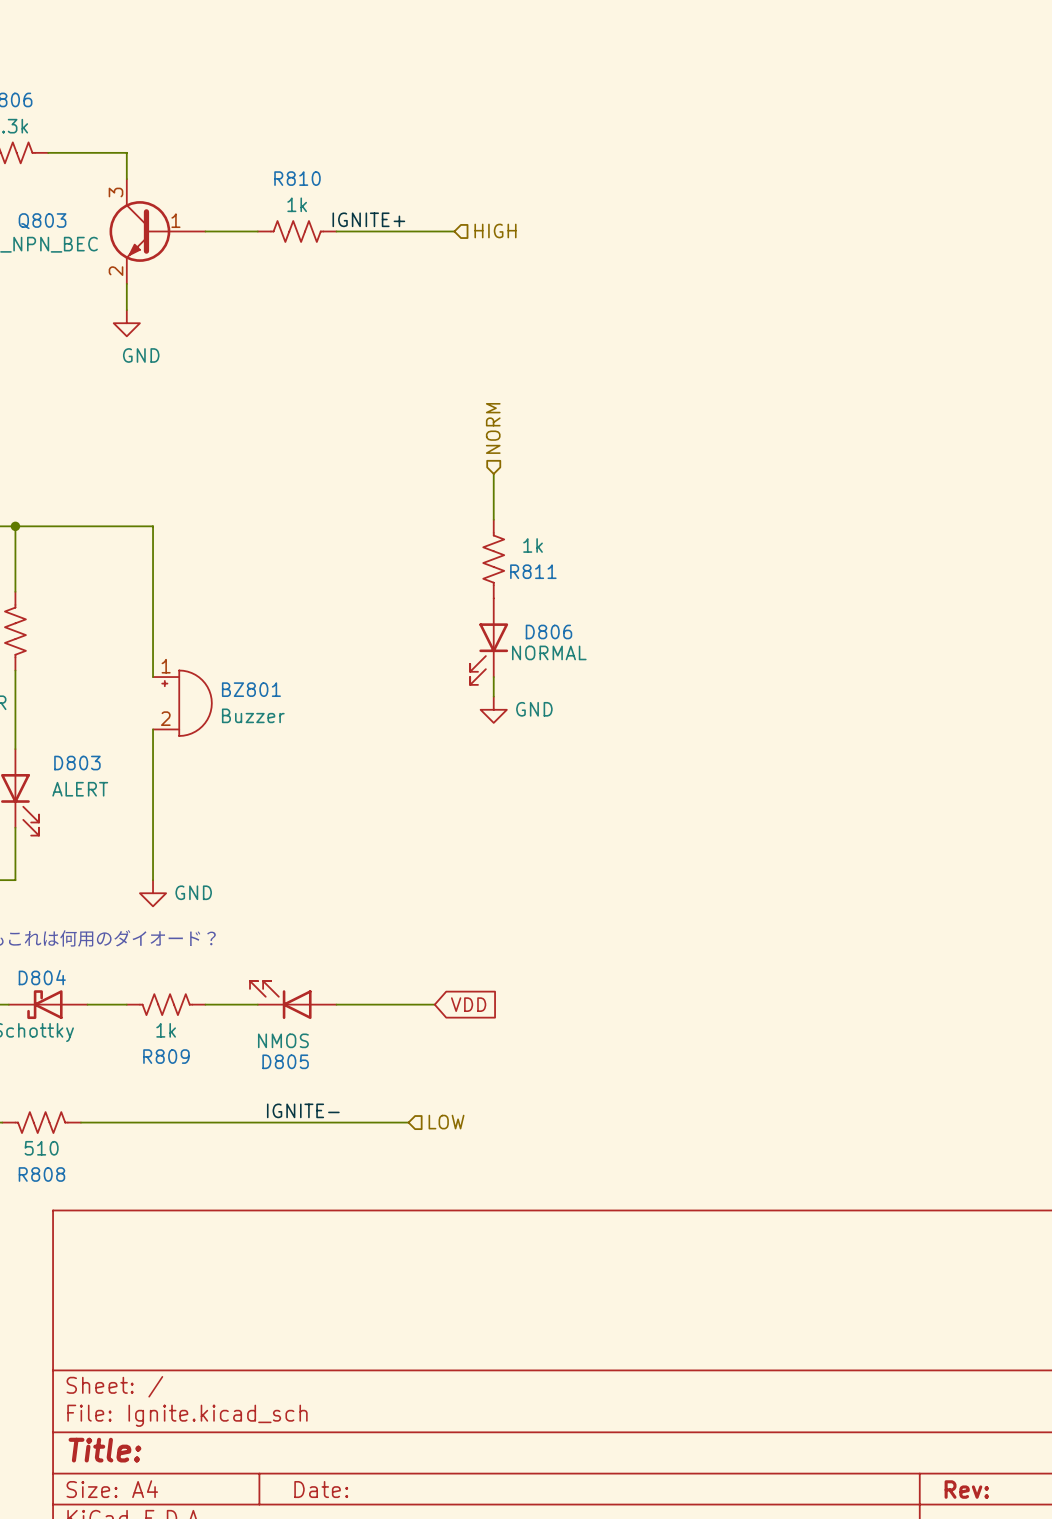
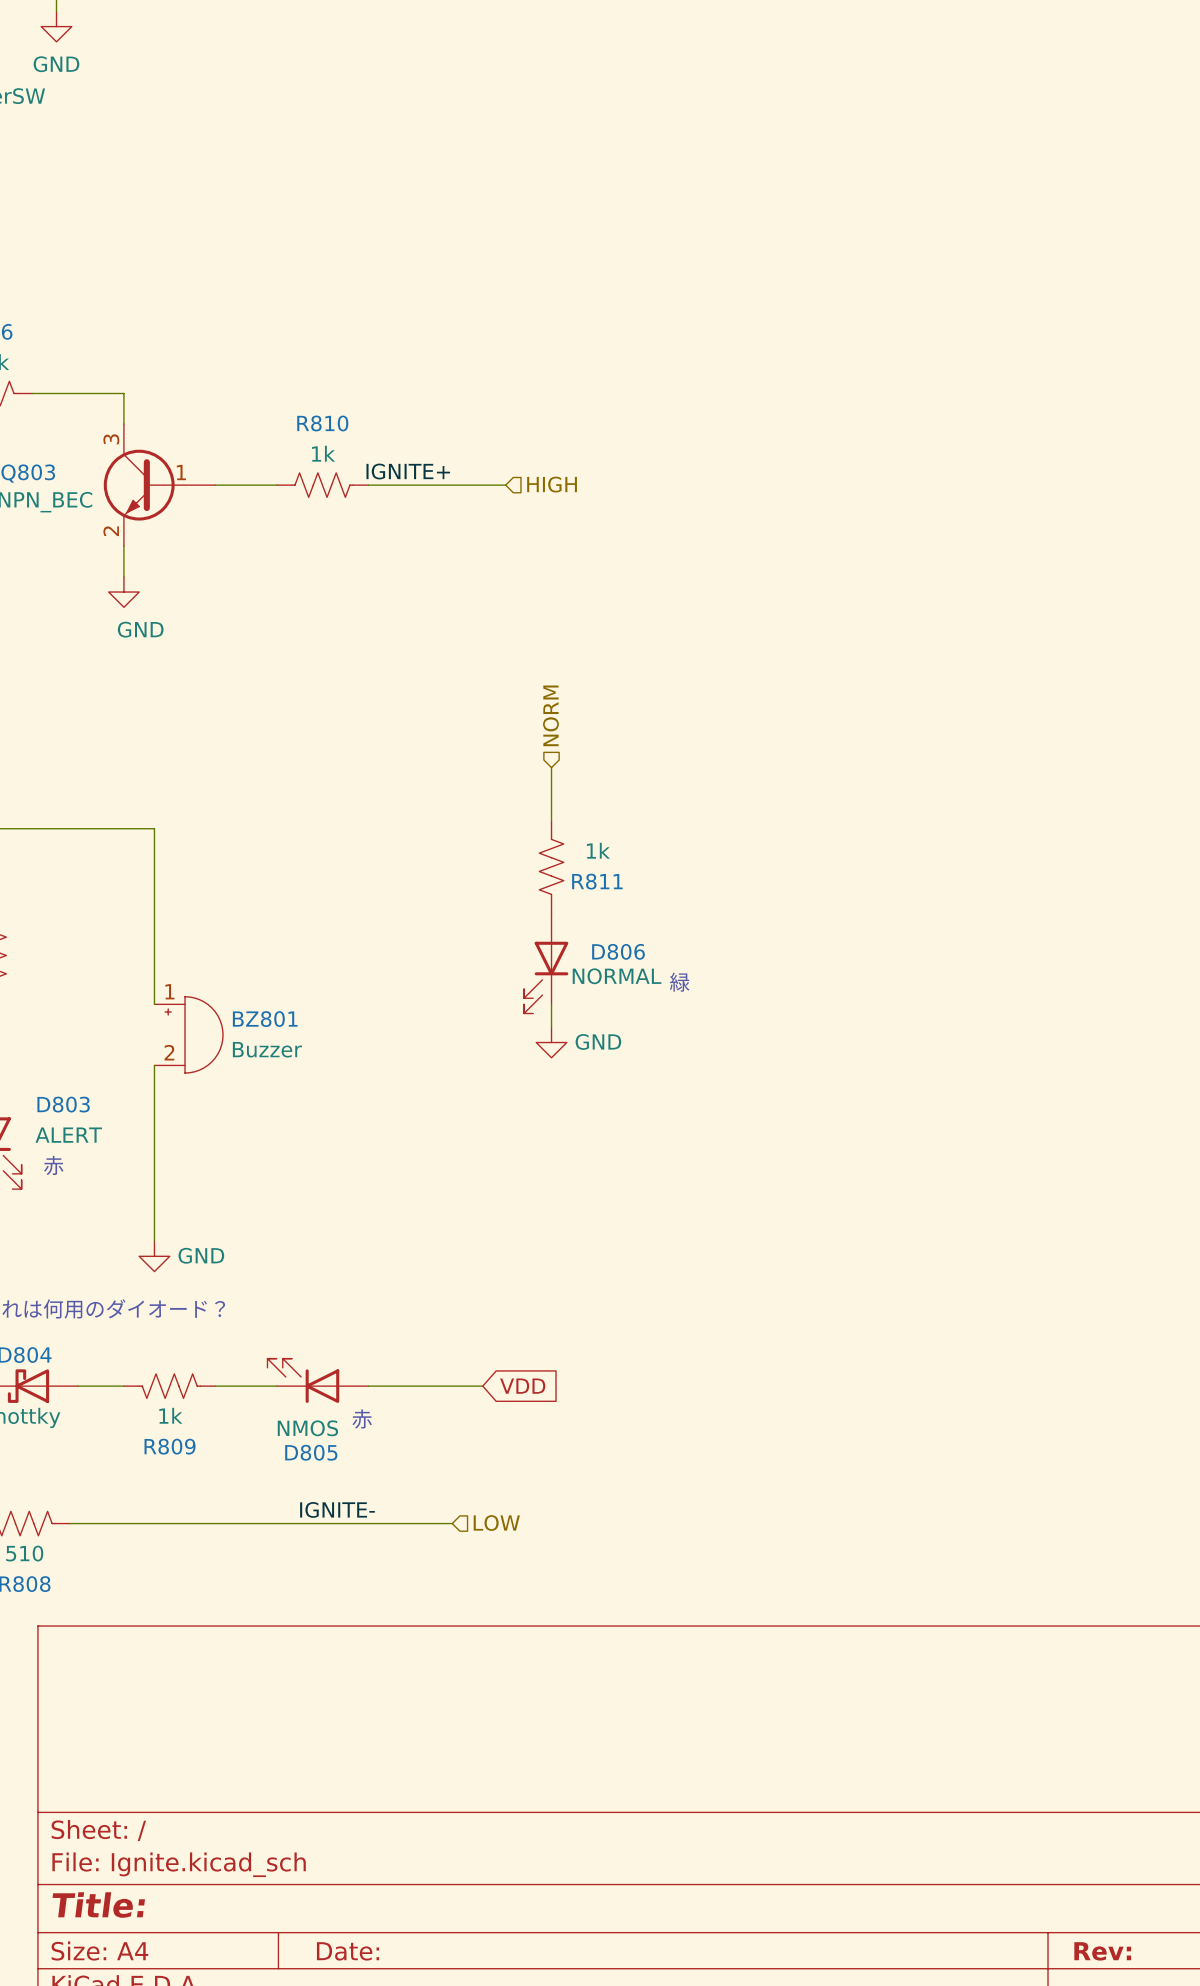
text: none -> 緑 (679, 982)
text: none -> 赤 (53, 1165)
text: none -> 赤 (362, 1418)

